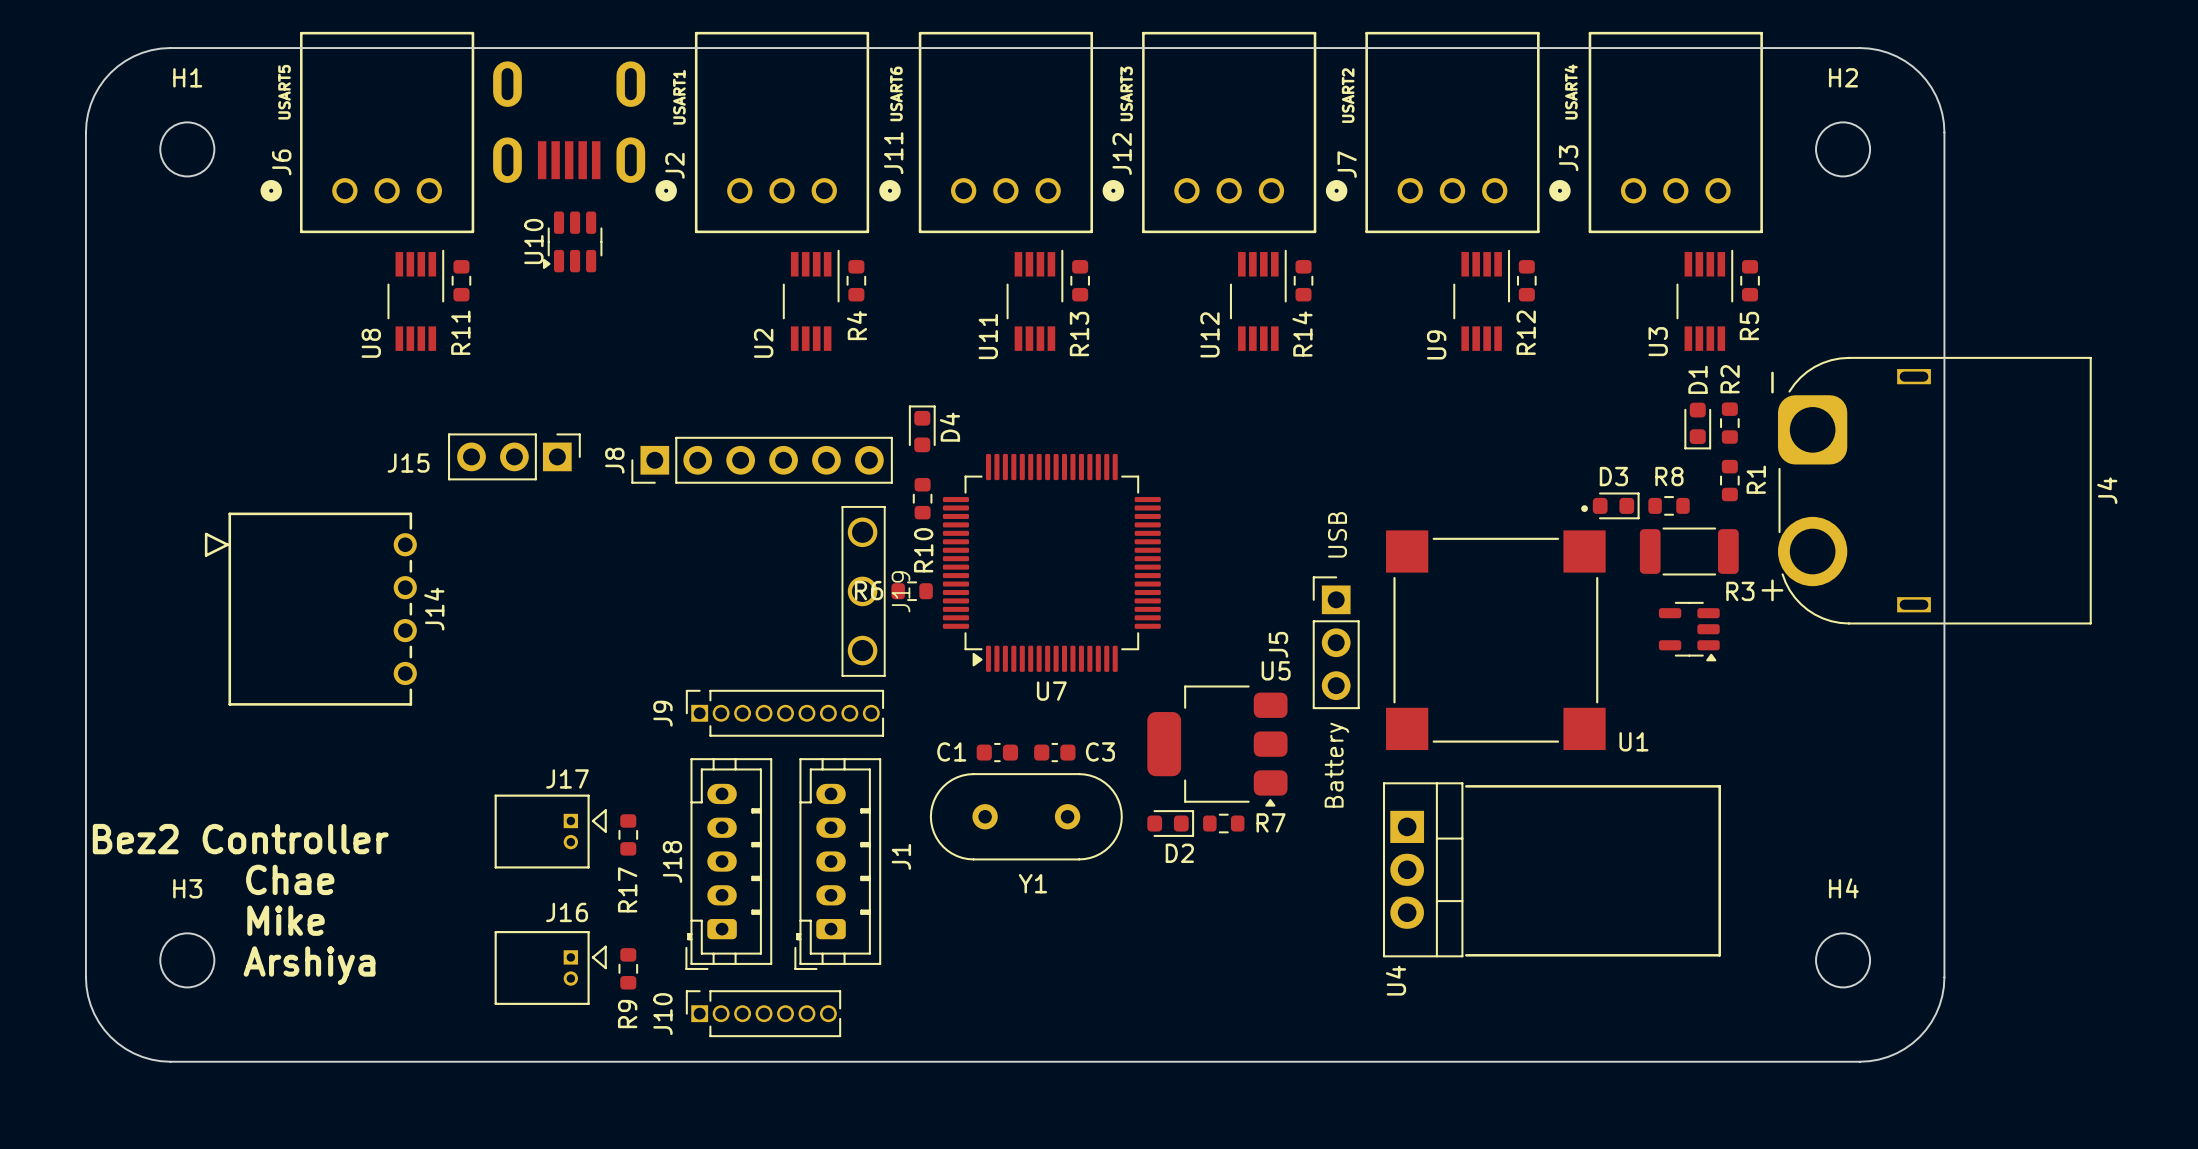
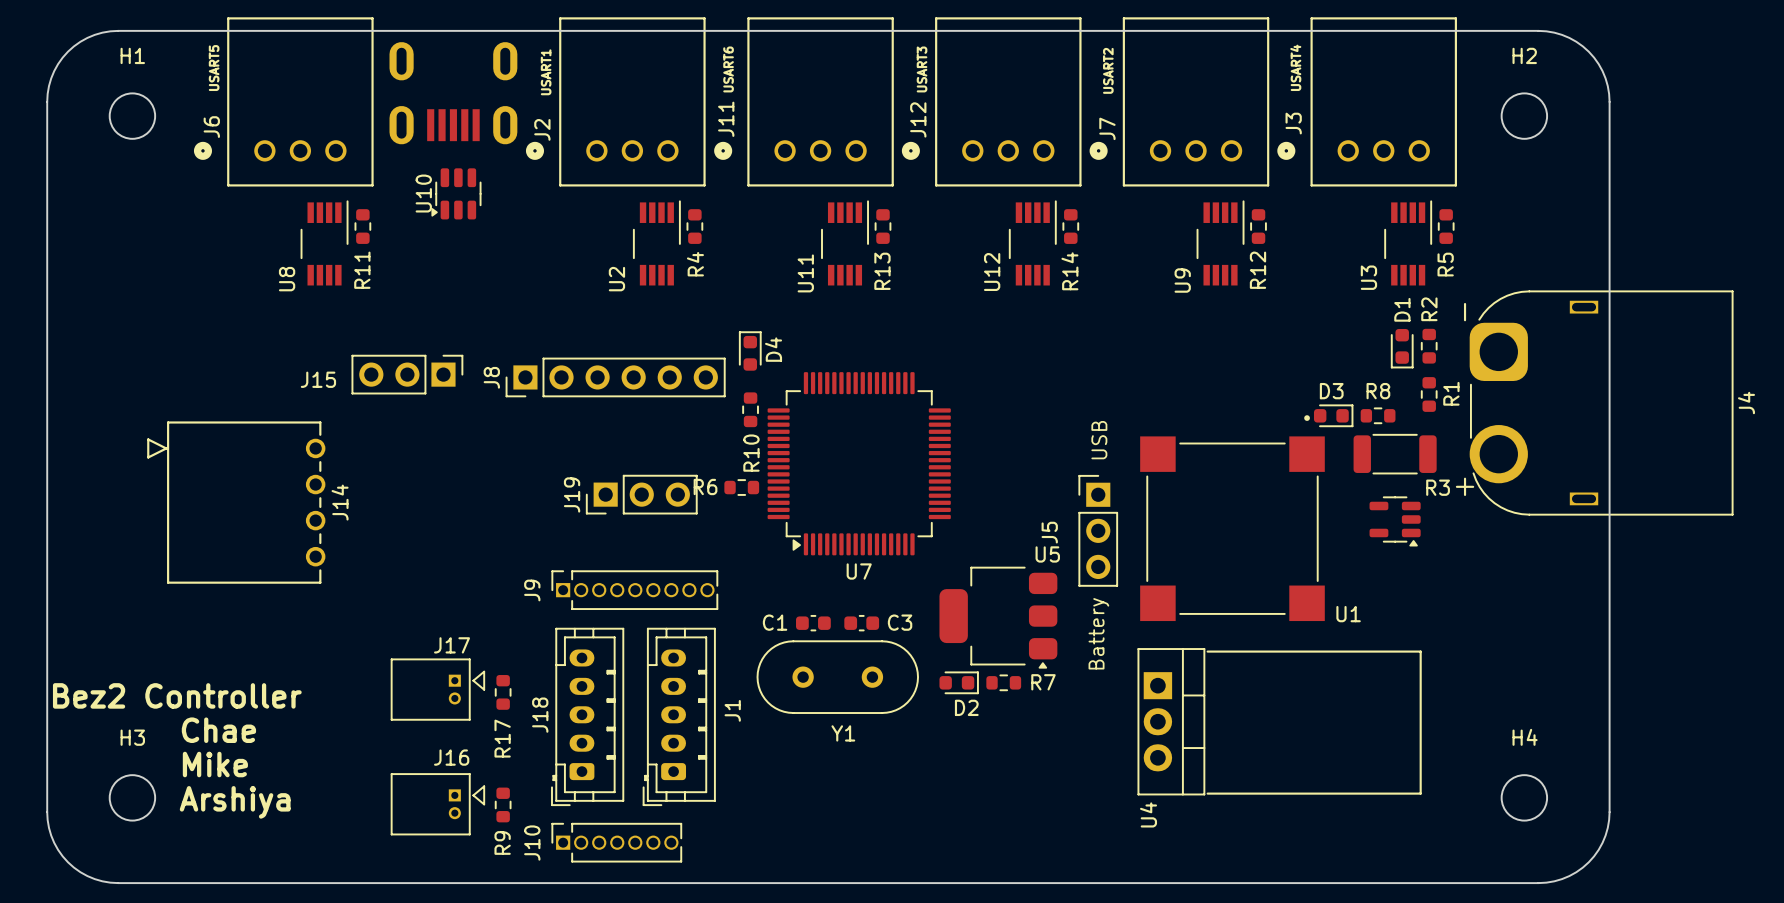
J19 footprint: [841, 506, 886, 677] -> [585, 474, 698, 515]
J19 name position: J19 (900, 591) -> J19 (572, 494)

